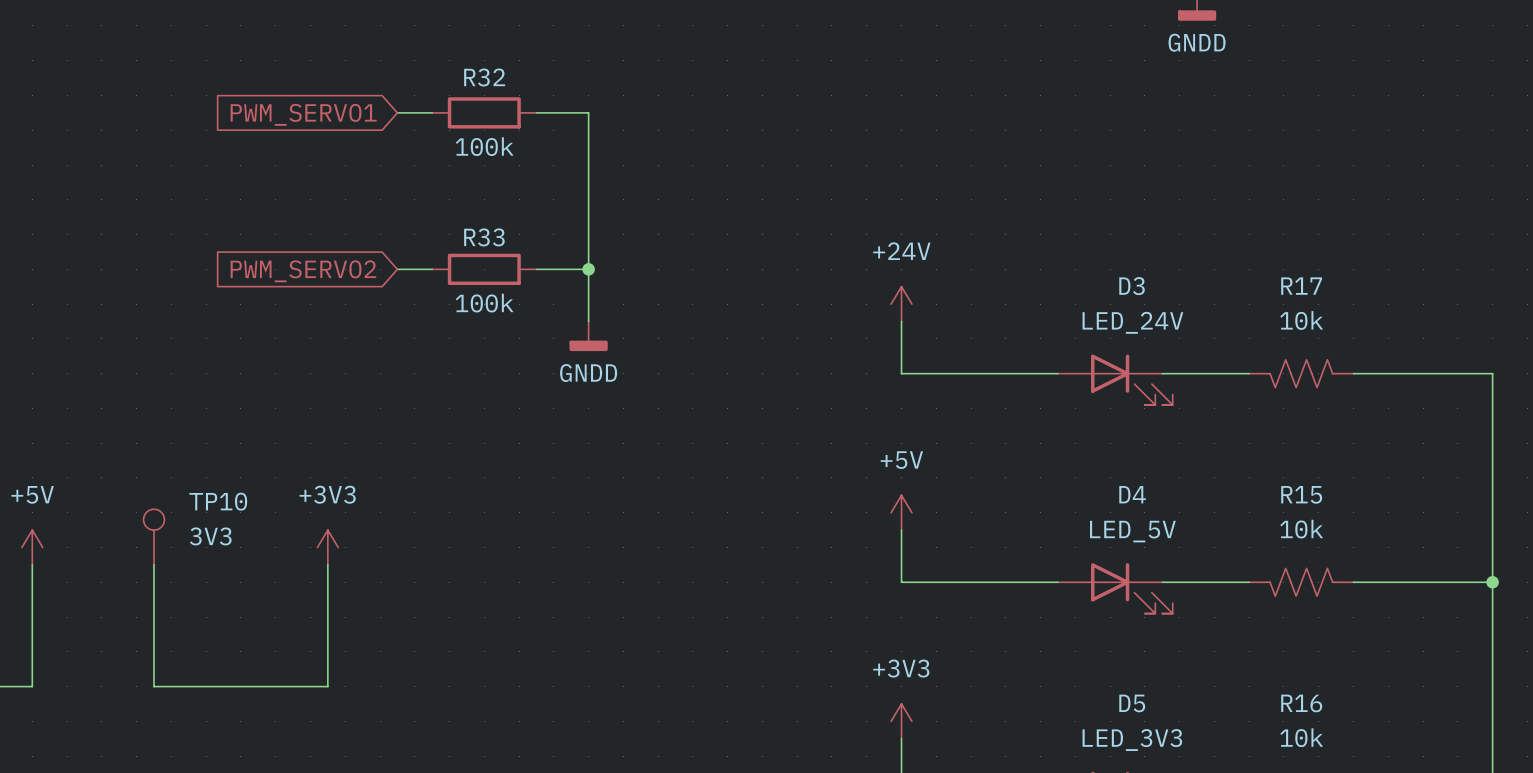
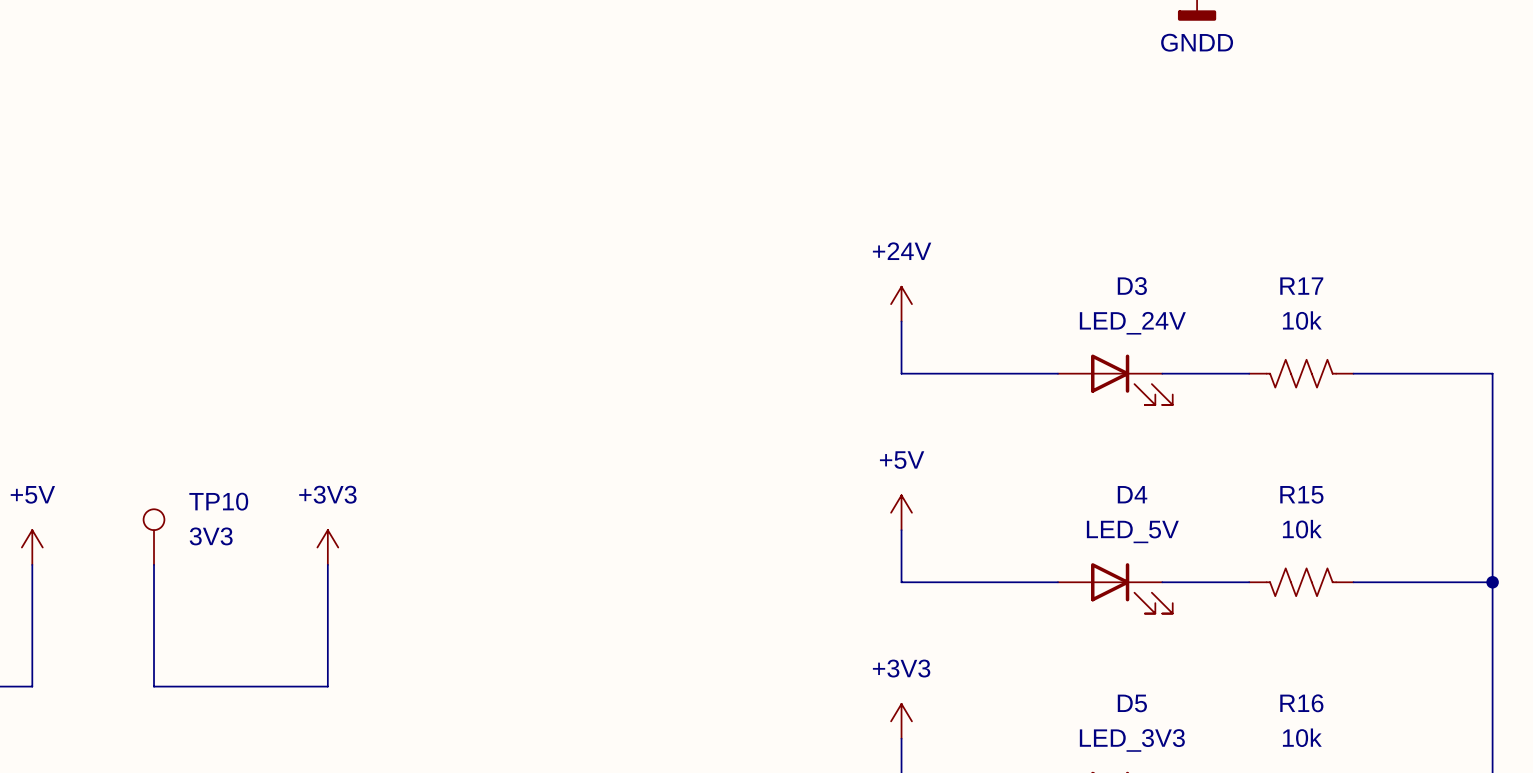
wire: (397, 112) (432, 112) -> none
R32: 100k (484, 112) -> none
wire: (536, 112) (588, 112) (588, 321) -> none
global label: PWM_SERVO1 (303, 114) -> none
wire: (397, 269) (432, 269) -> none
R33: 100k (484, 269) -> none
wire: (536, 269) (588, 269) -> none
junction: (588, 269) -> none
global label: PWM_SERVO2 (303, 271) -> none
power symbol: GNDD (588, 336) -> none

